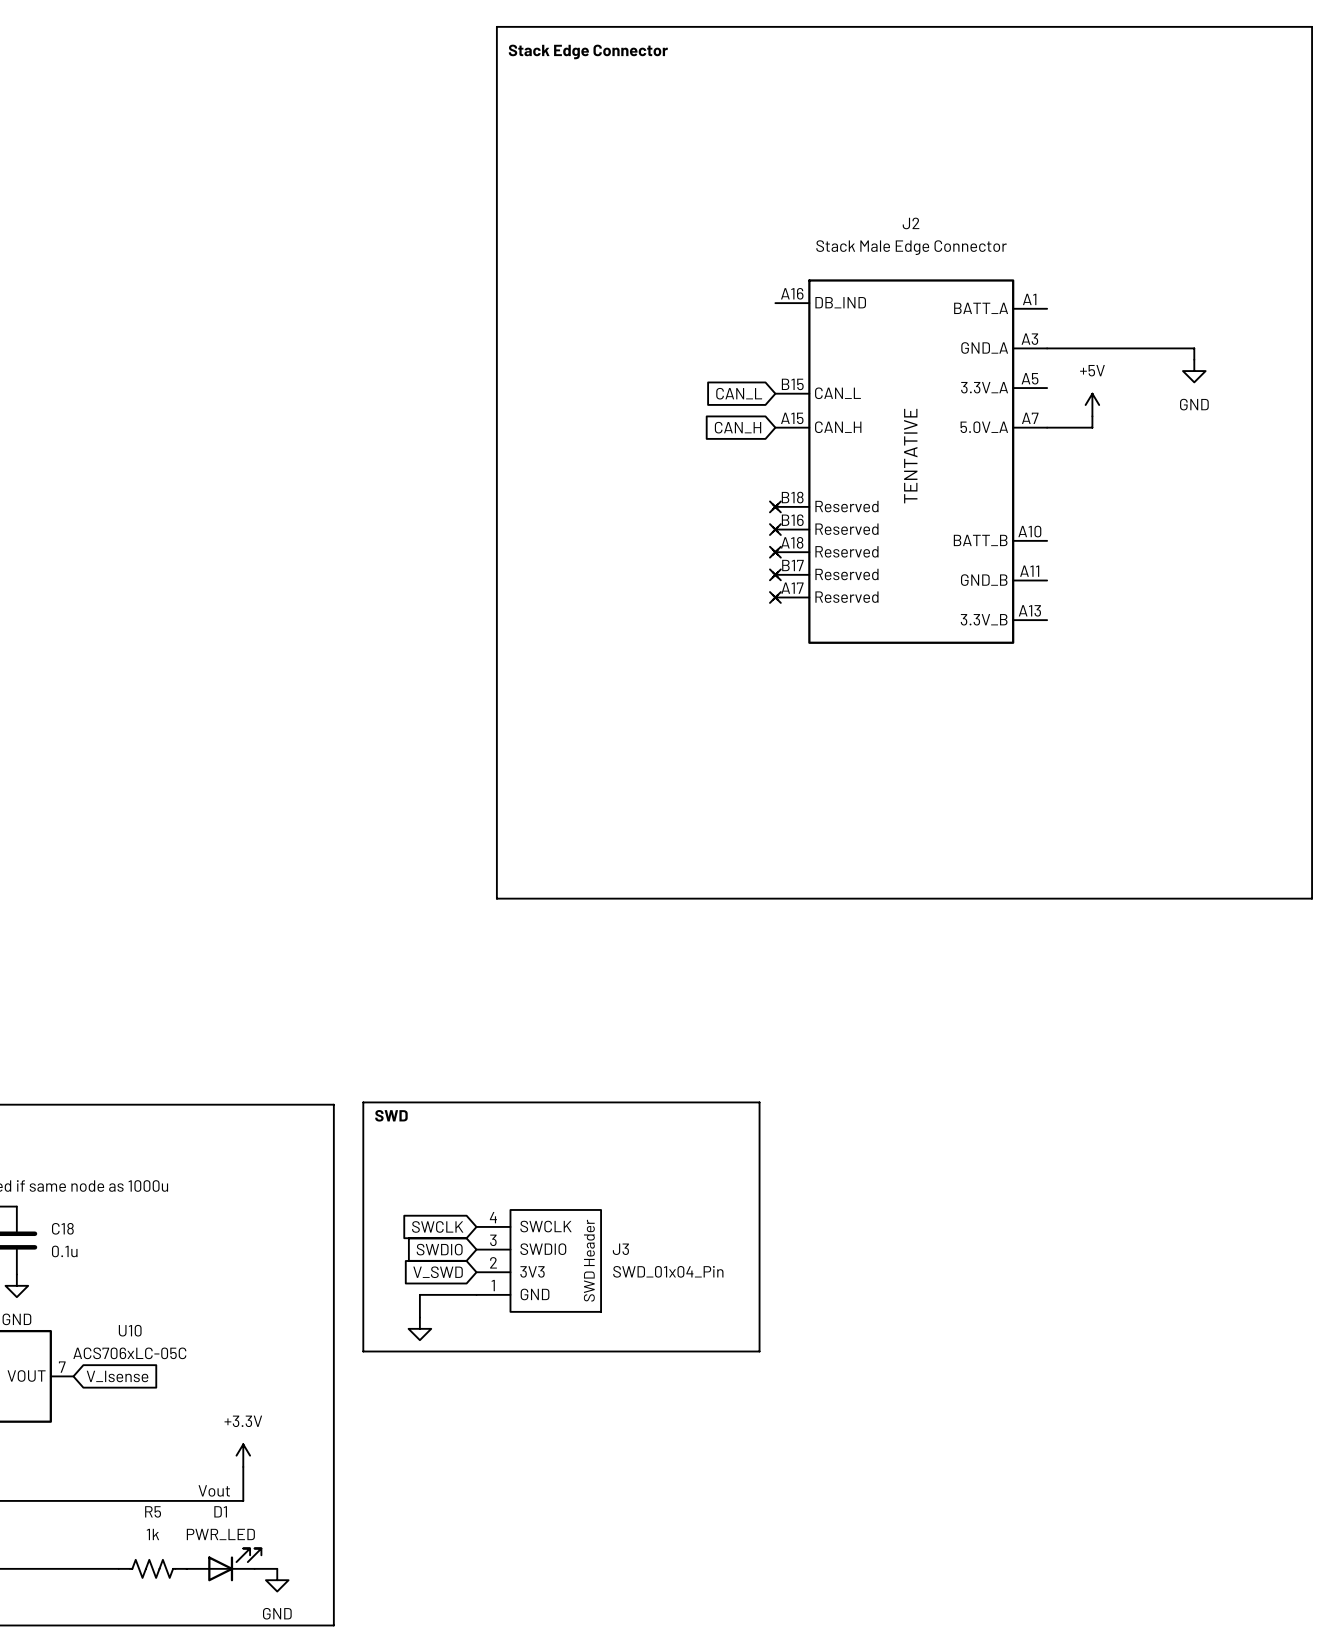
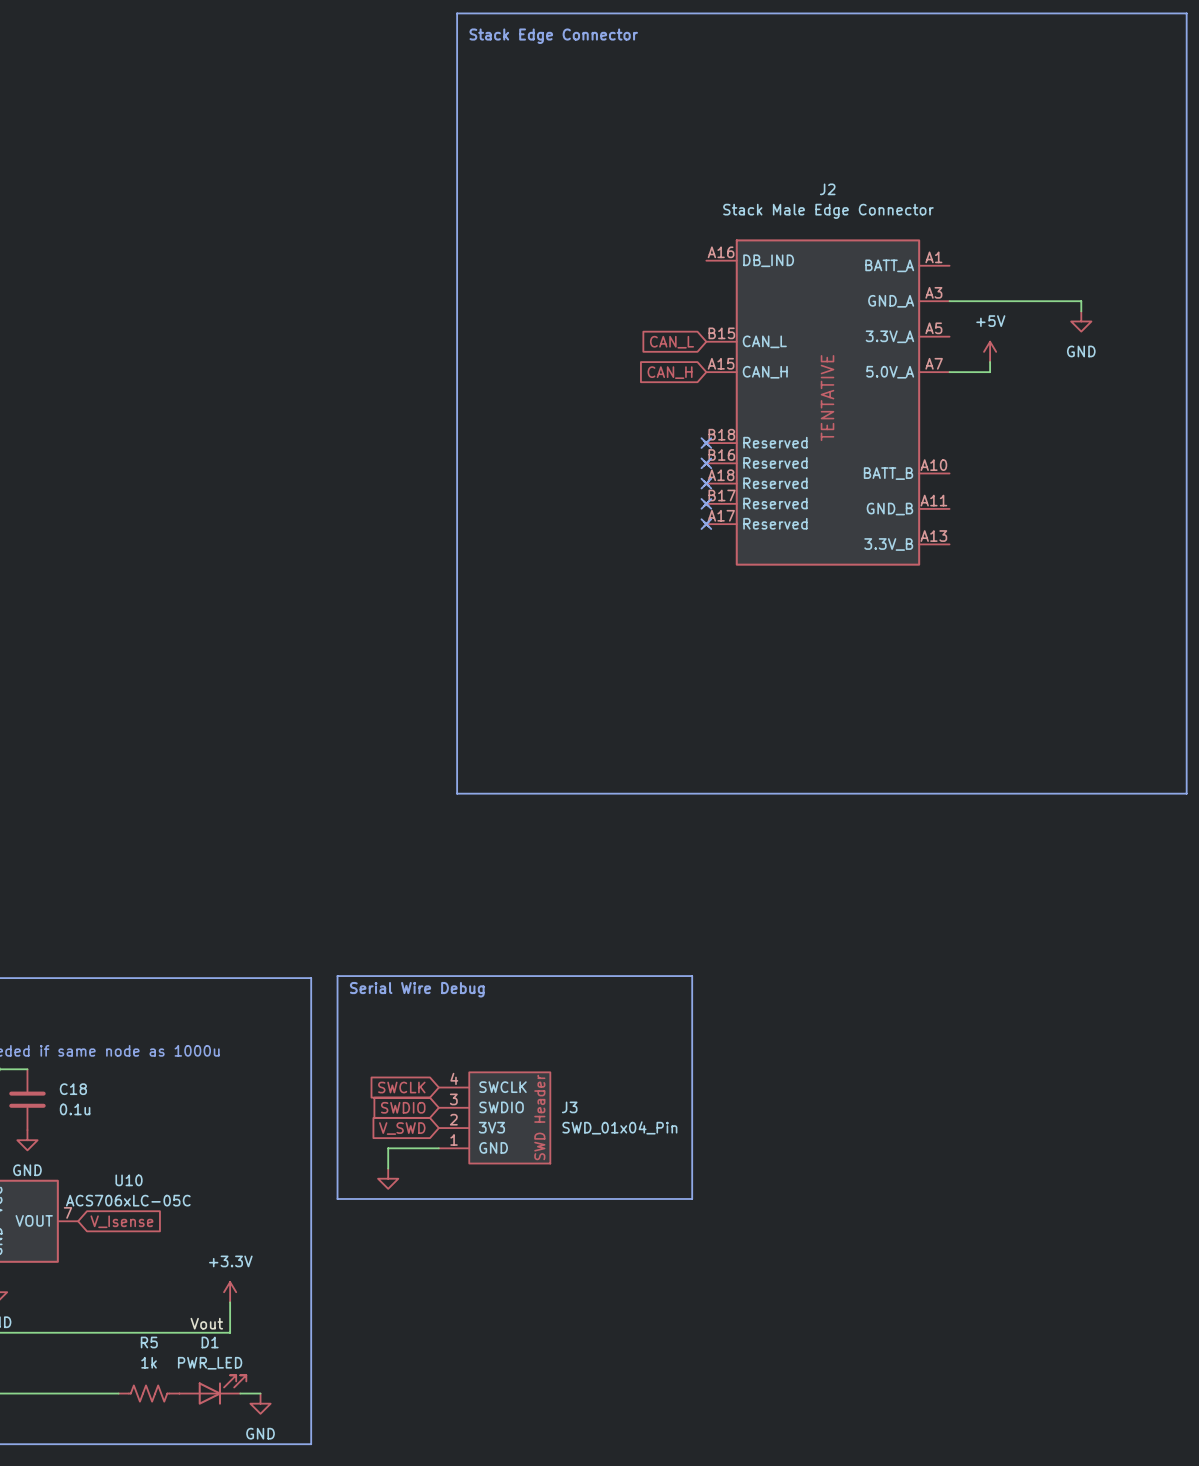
text: SWD (391, 1115) -> Serial Wire Debug (417, 989)

